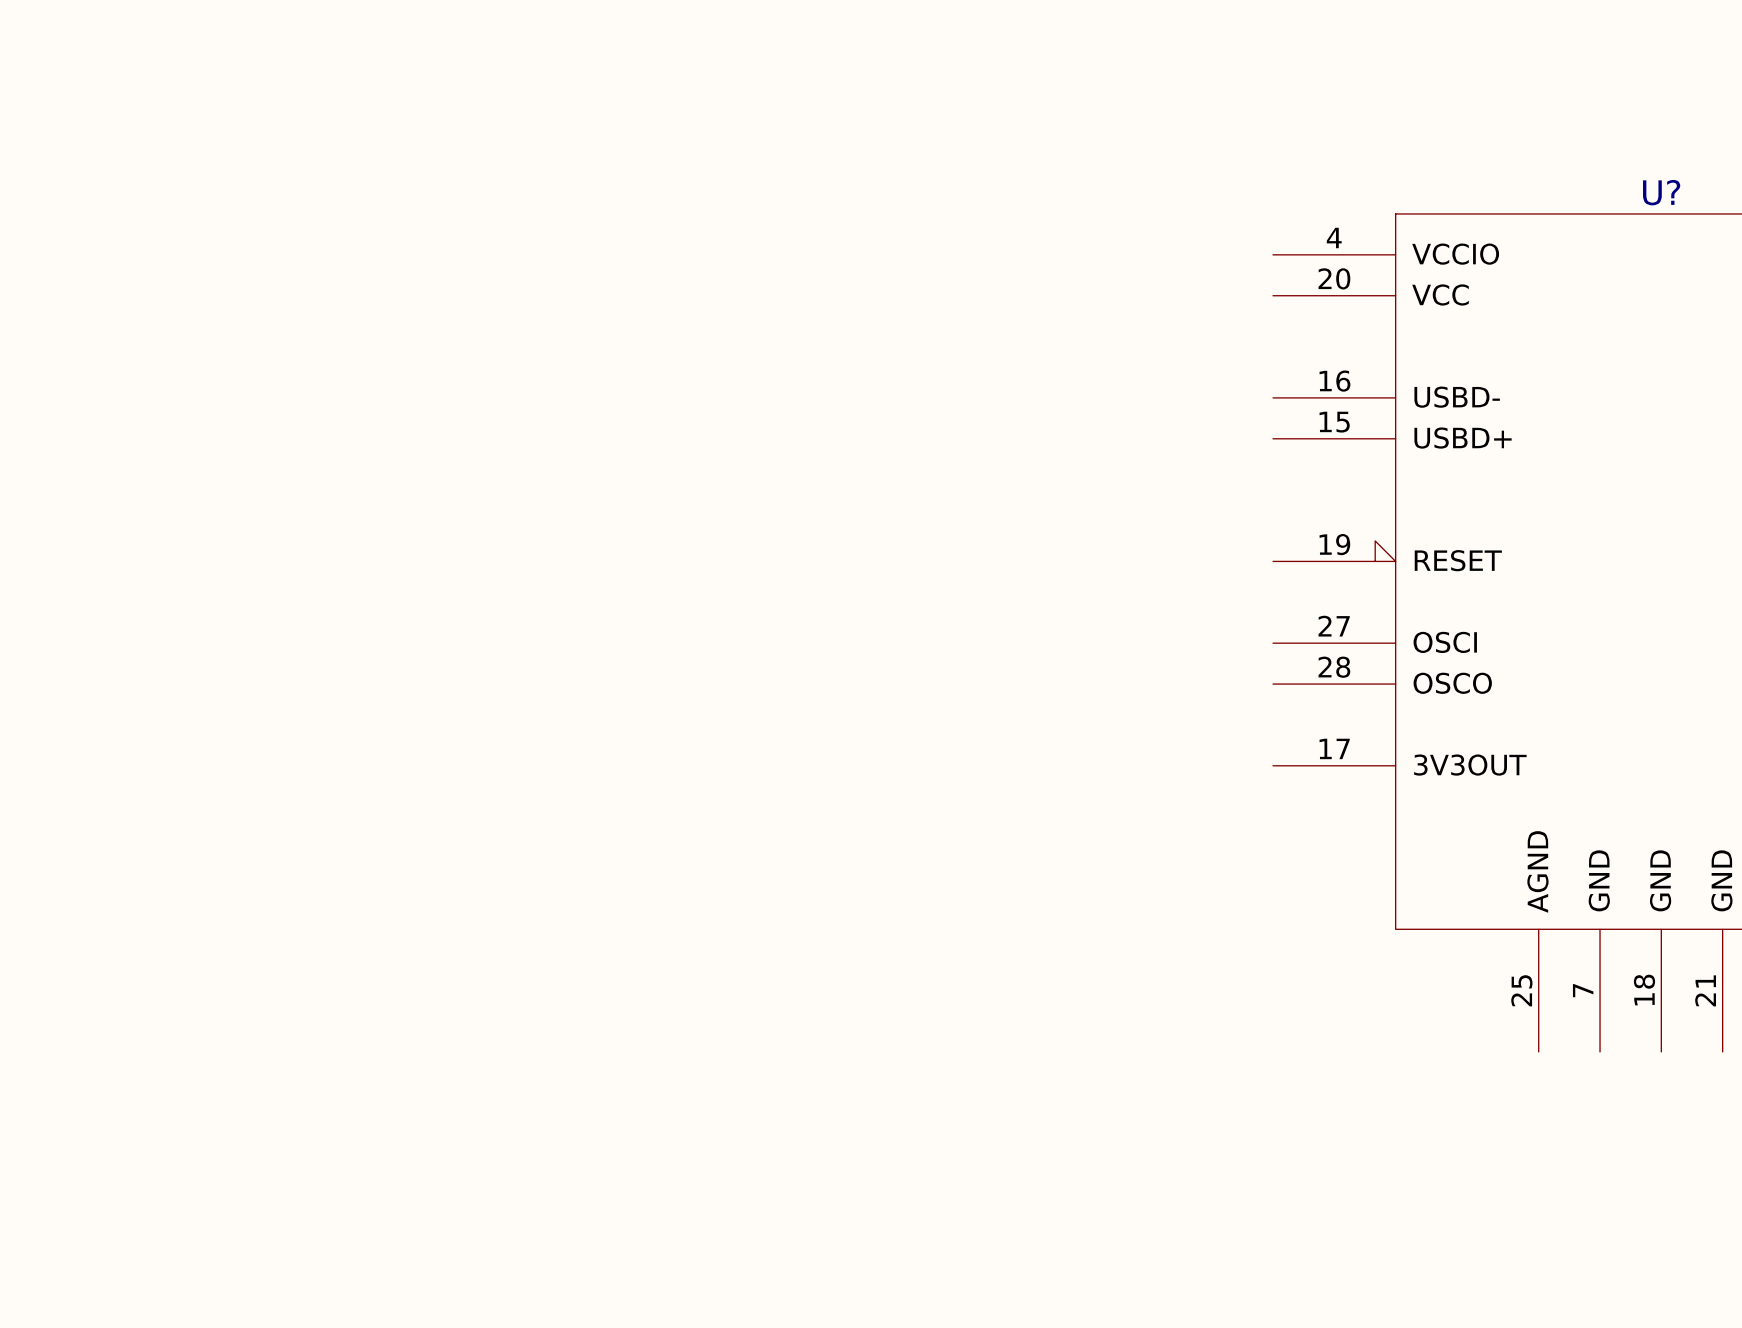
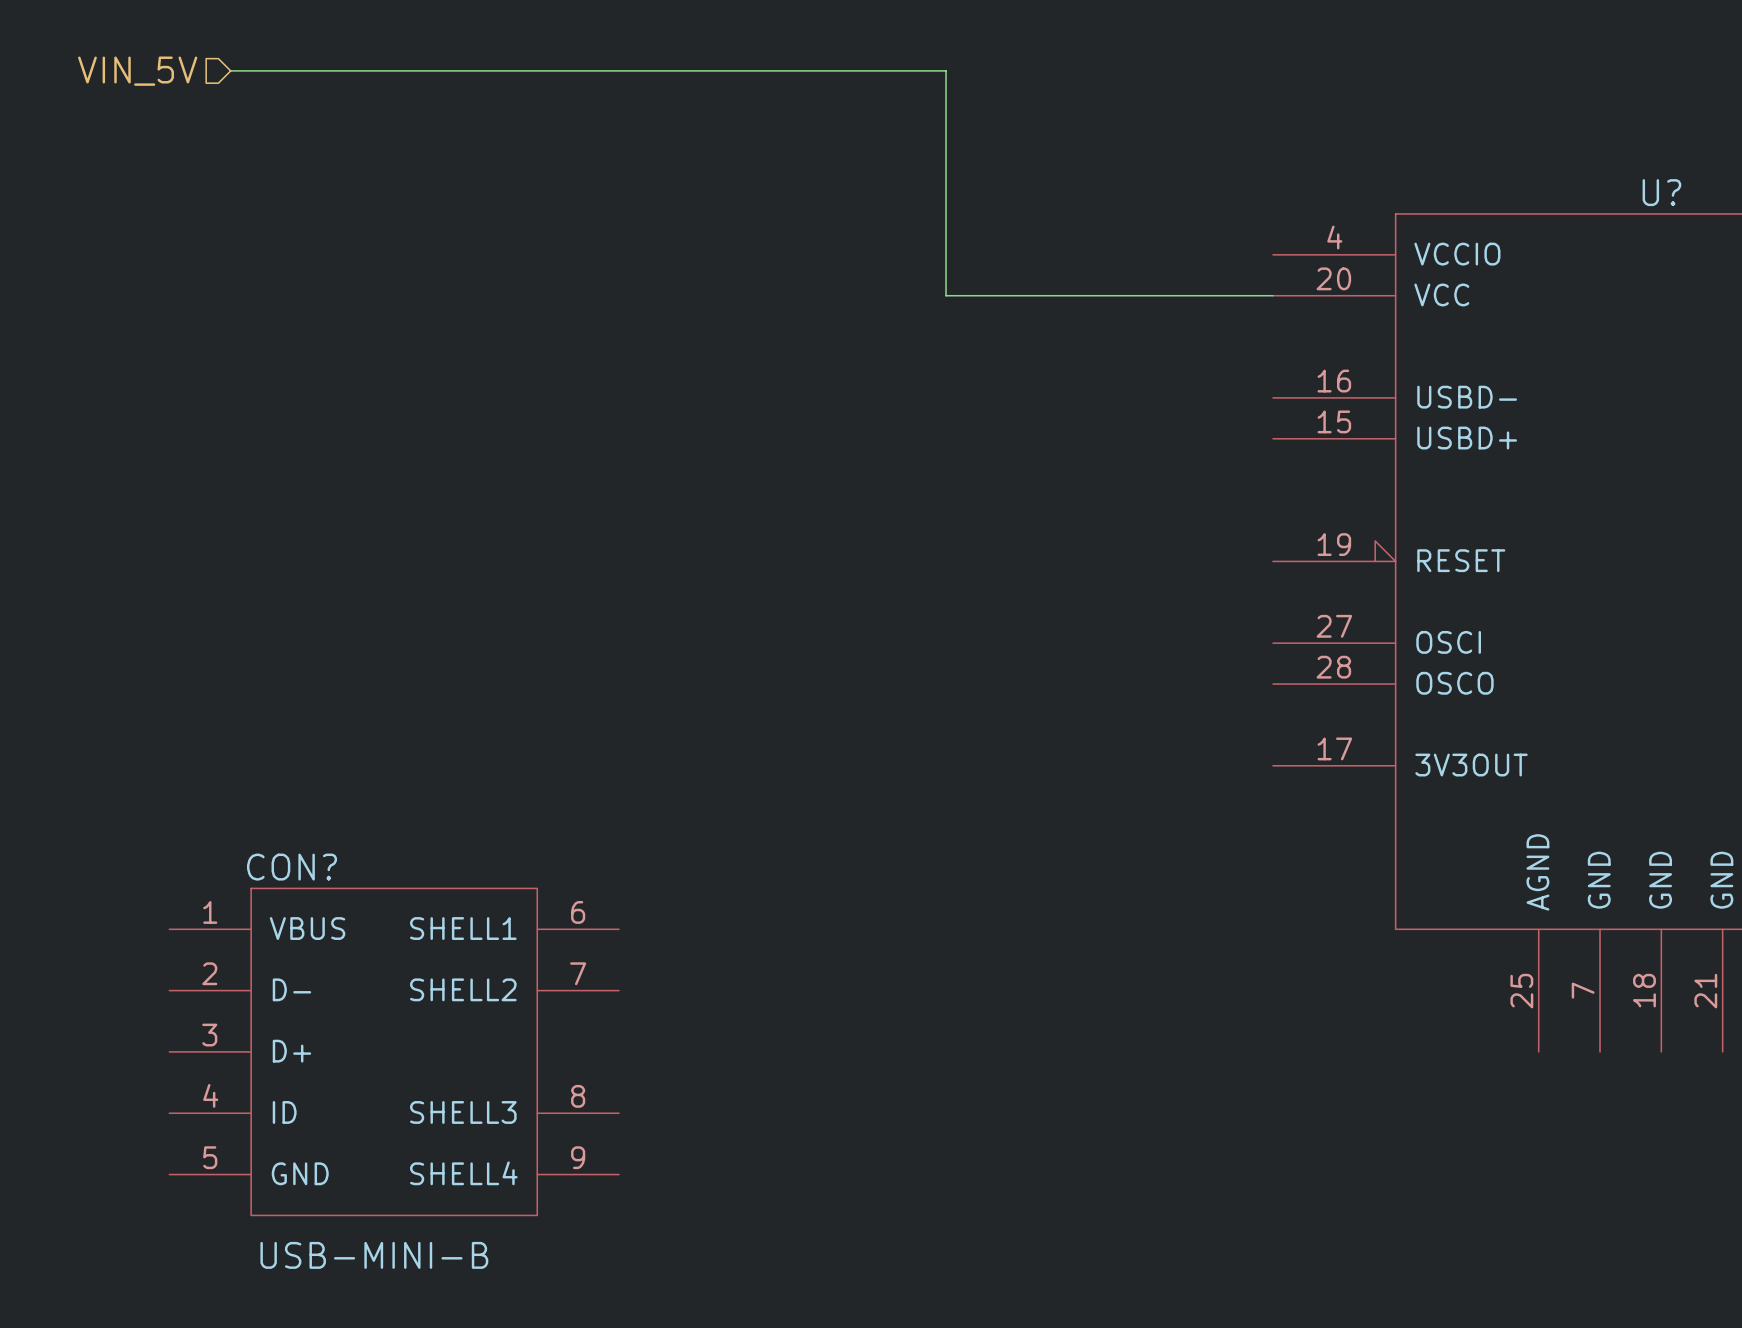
wire: none -> (230, 70) (946, 70) (946, 295) (1273, 295)
hierarchical label: none -> VIN_5V (137, 71)
CON?: none -> USB-MINI-B (394, 1051)

